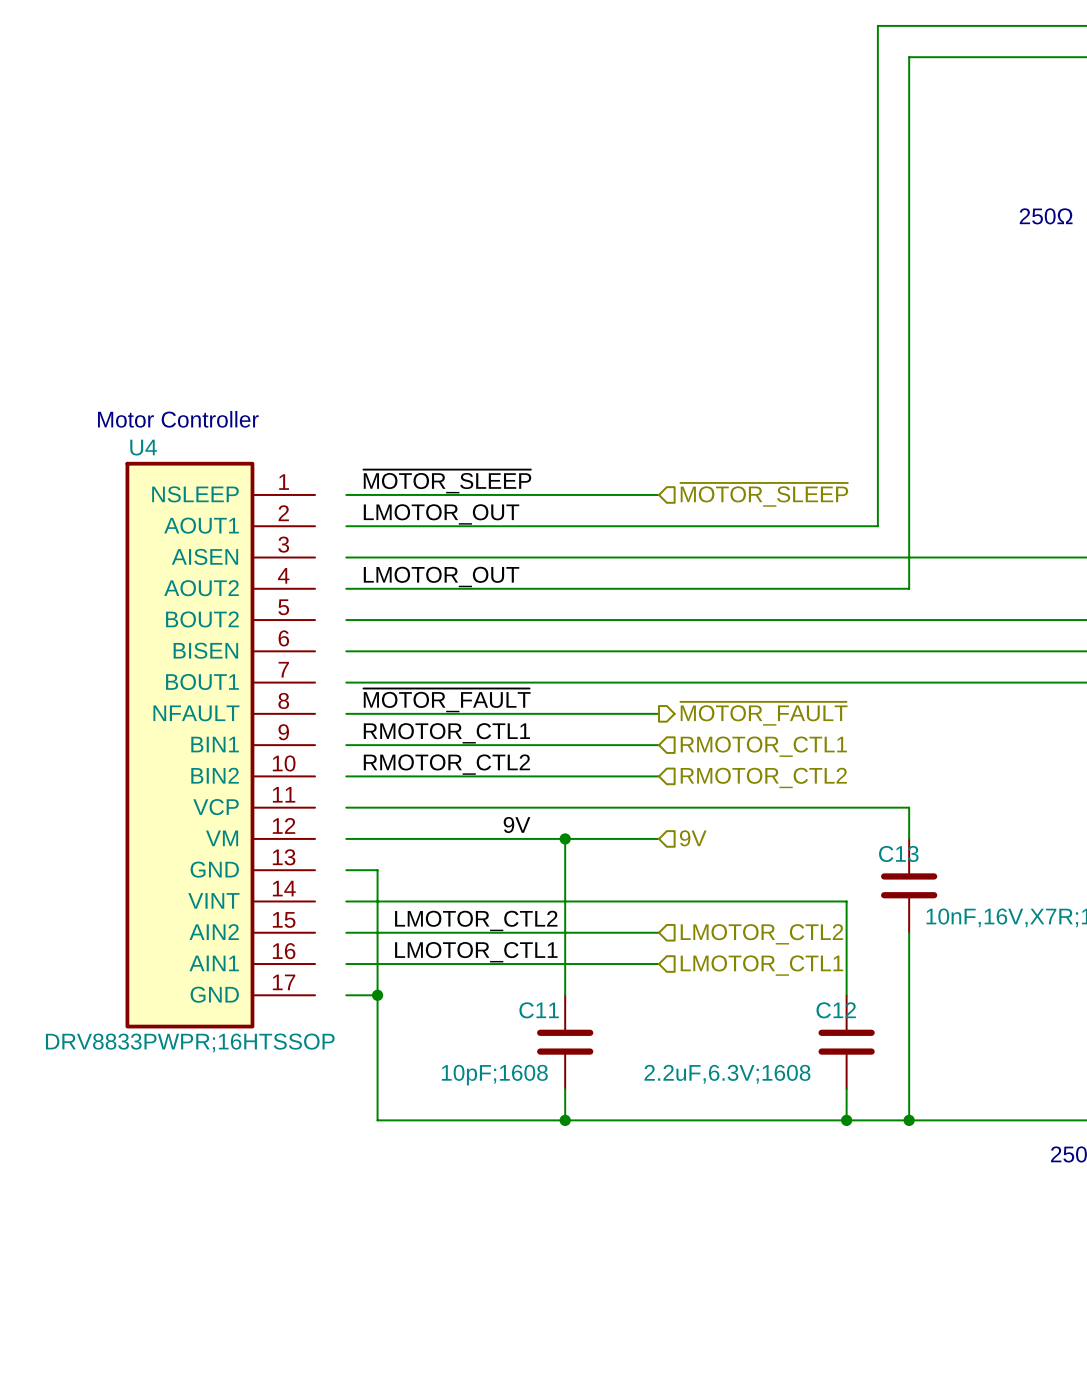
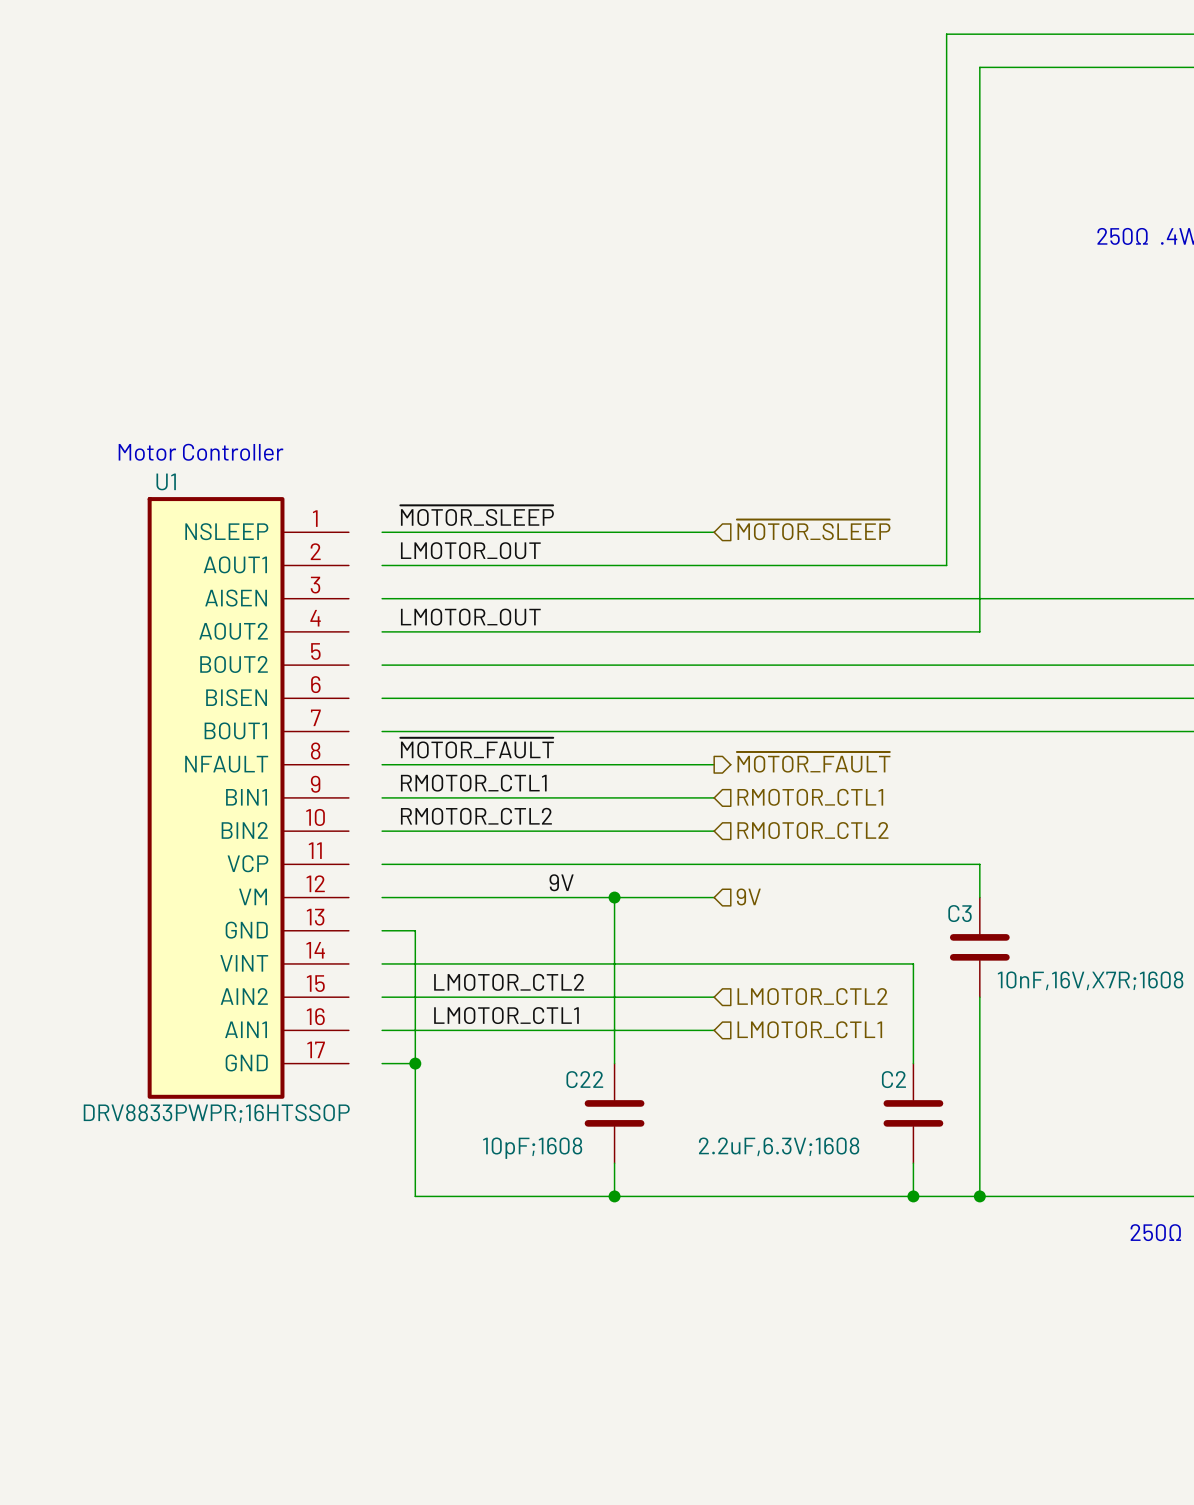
U4 name: U4 (143, 447) -> U1 (166, 481)
C13 name: C13 (898, 853) -> C3 (960, 913)
C11 name: C11 (539, 1010) -> C22 (584, 1079)
C12 name: C12 (836, 1010) -> C2 (893, 1079)

